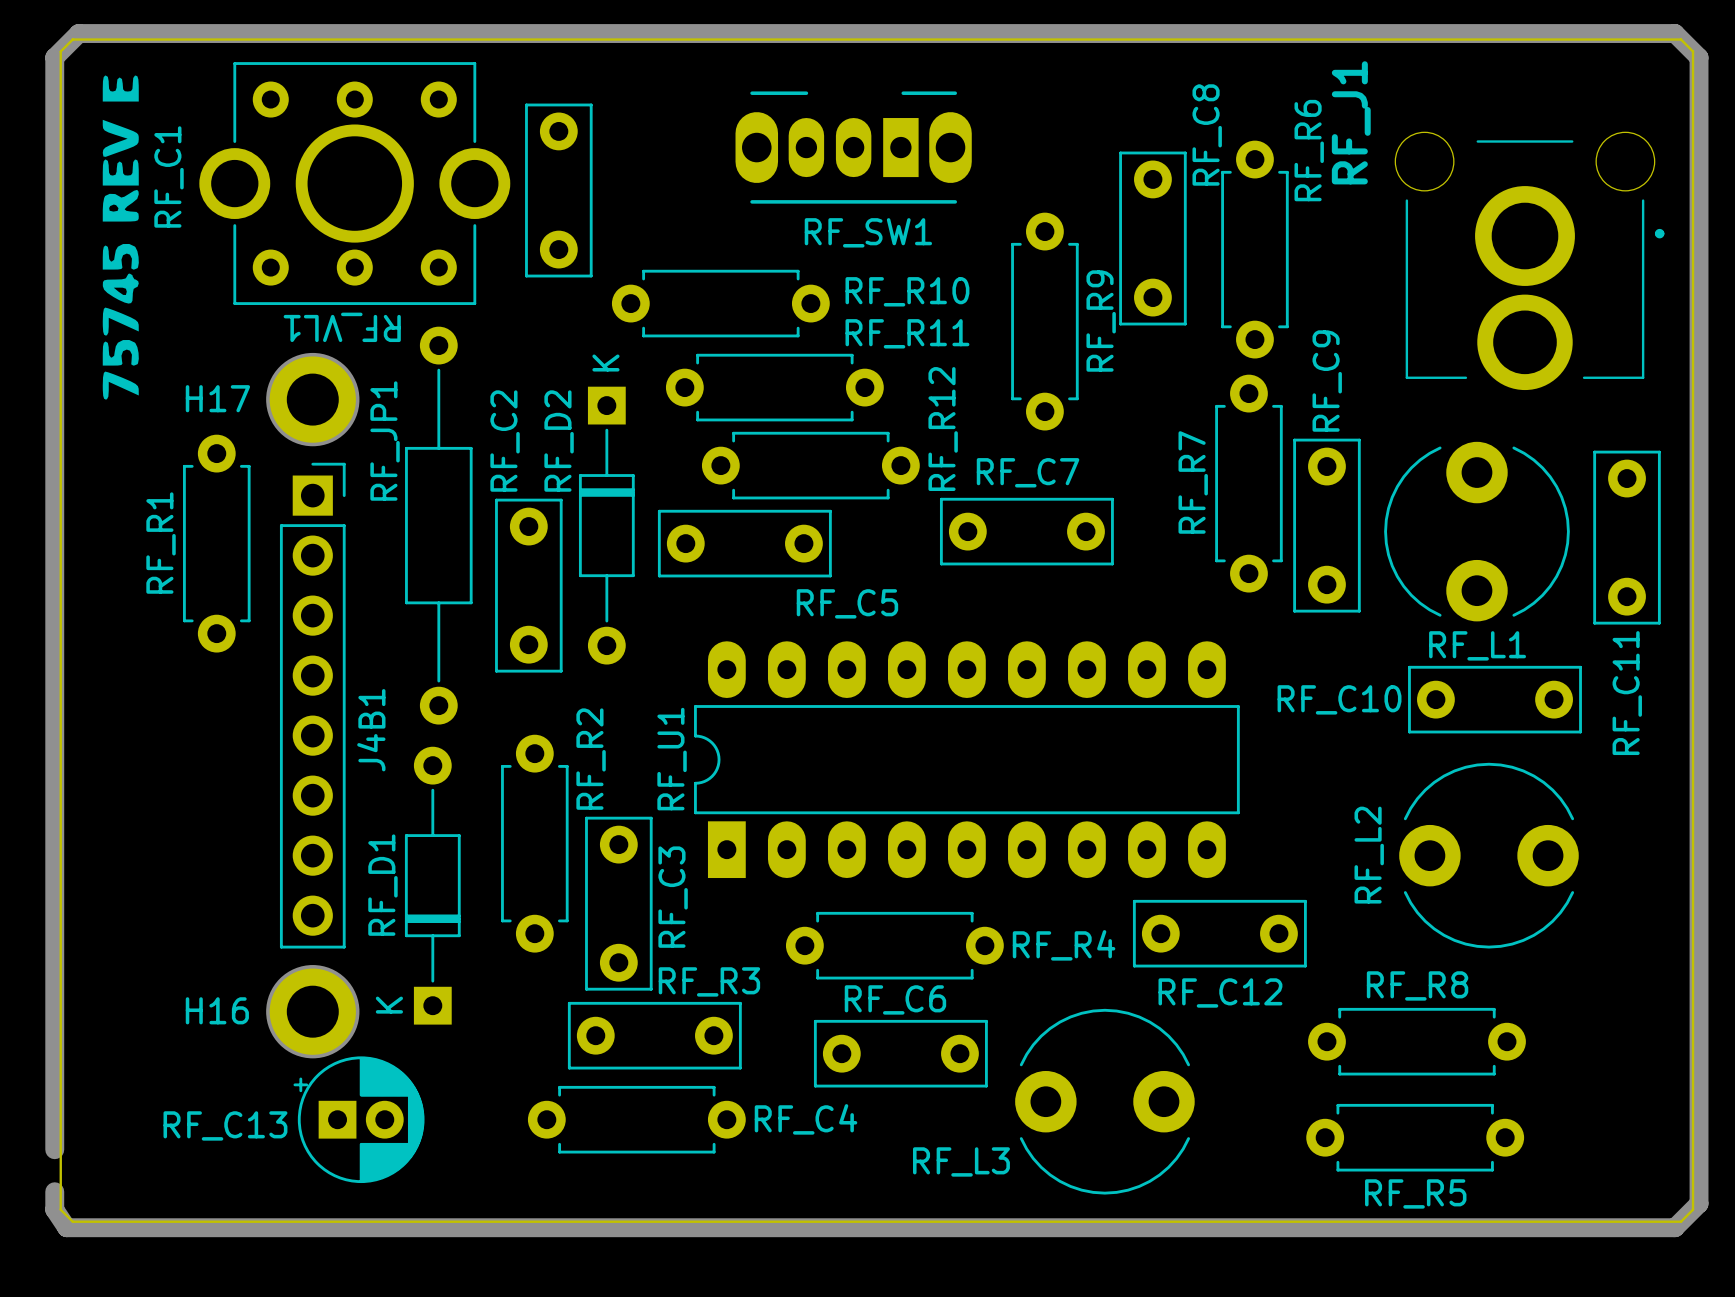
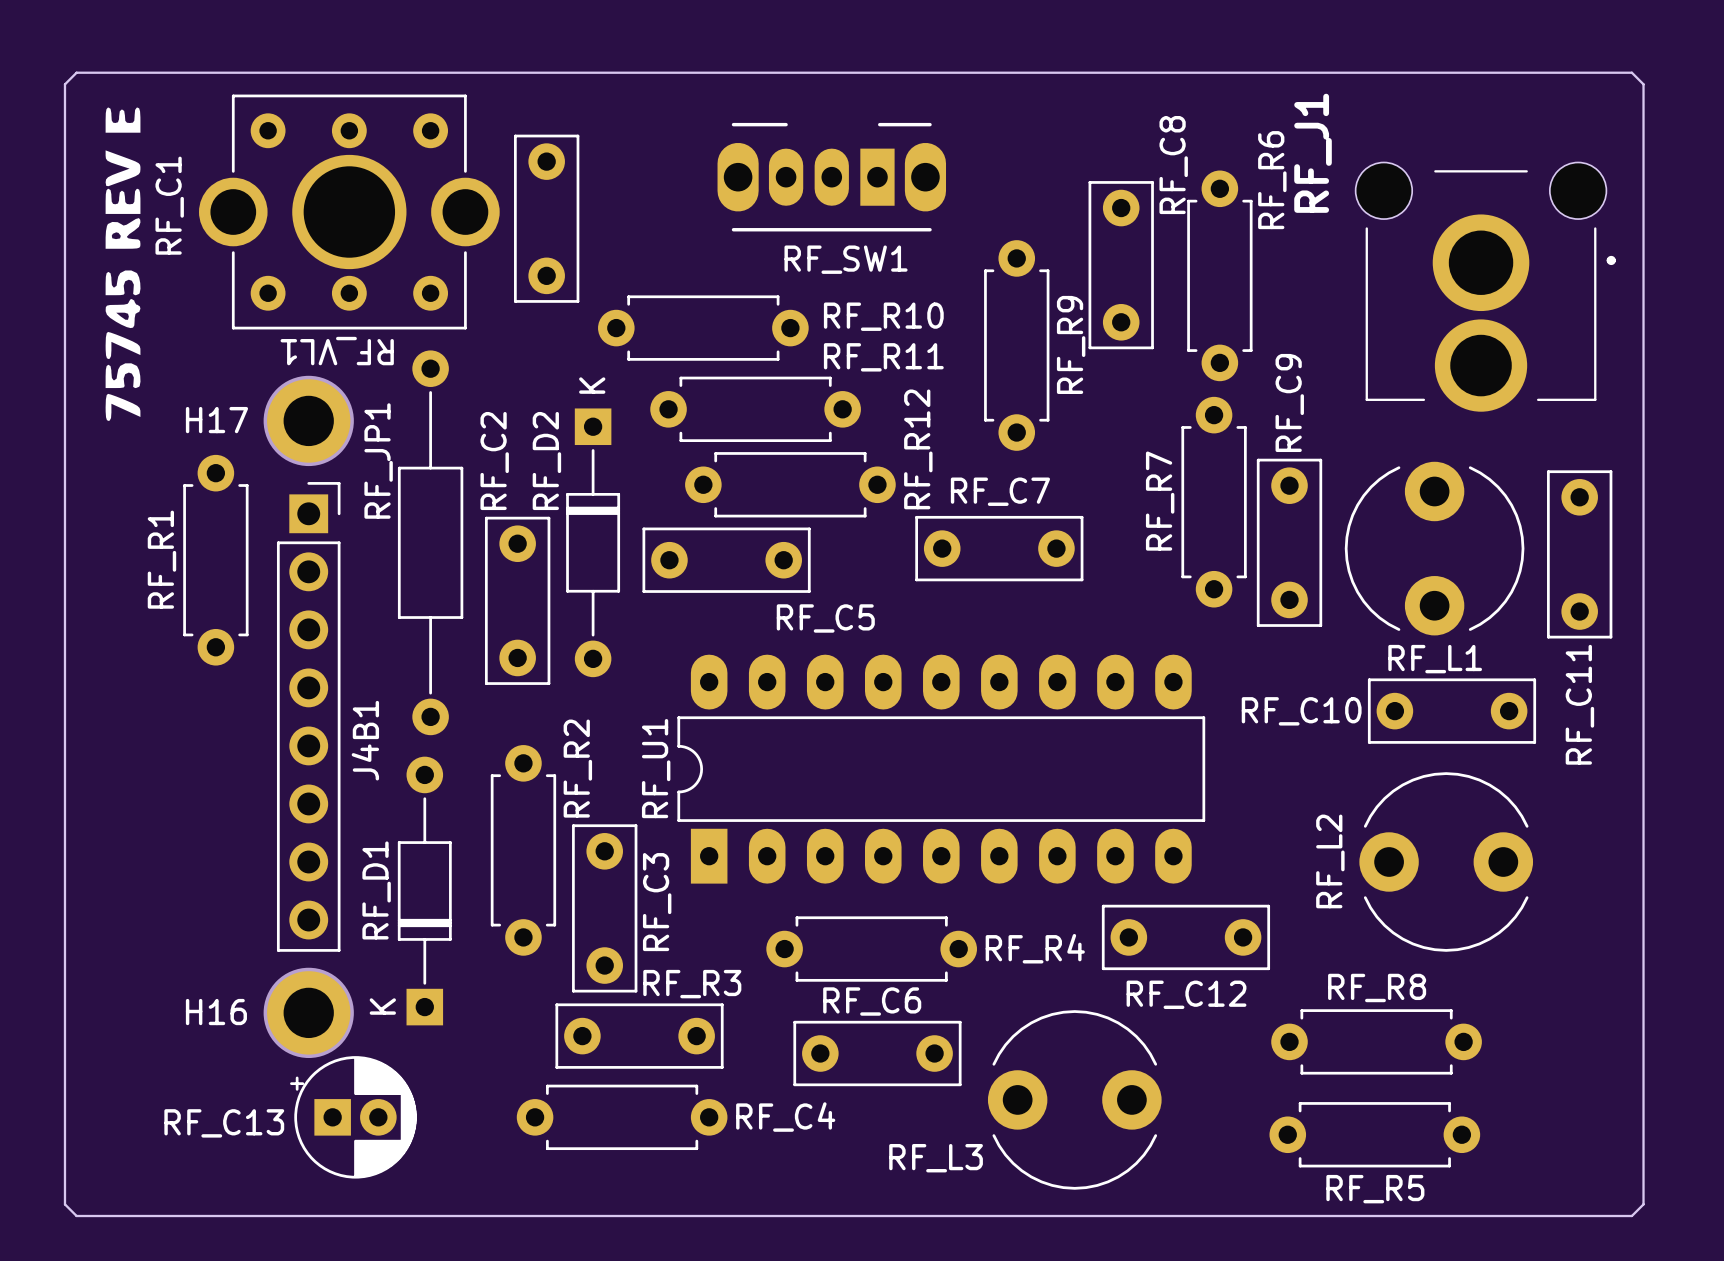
line: (54, 1149) (54, 57) (78, 33) (1675, 33) (1699, 57) (1699, 1203) (1675, 1227) (66, 1227) (54, 1209) (54, 1191) -> none

